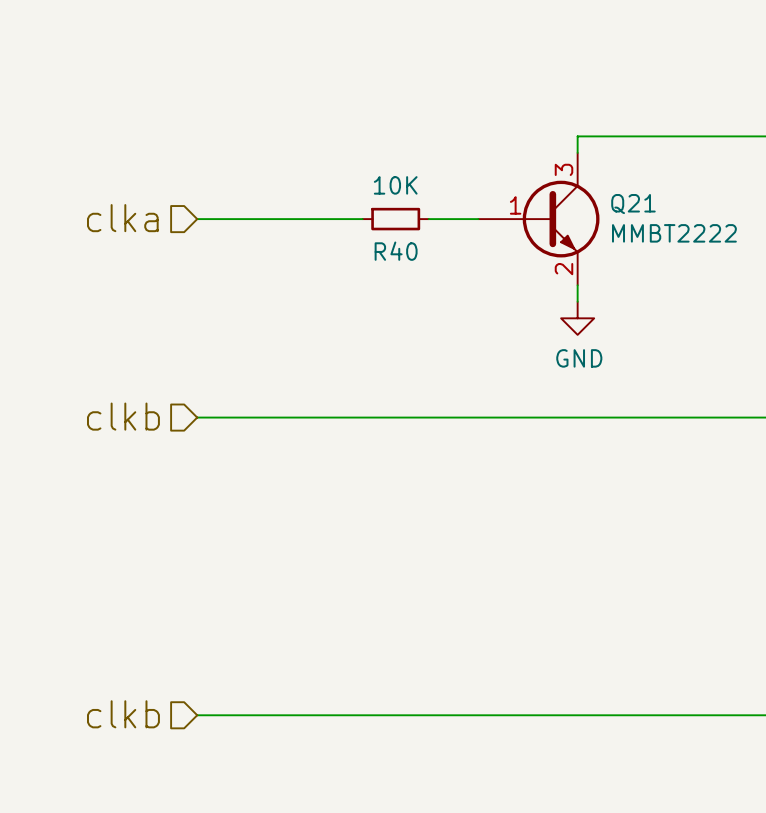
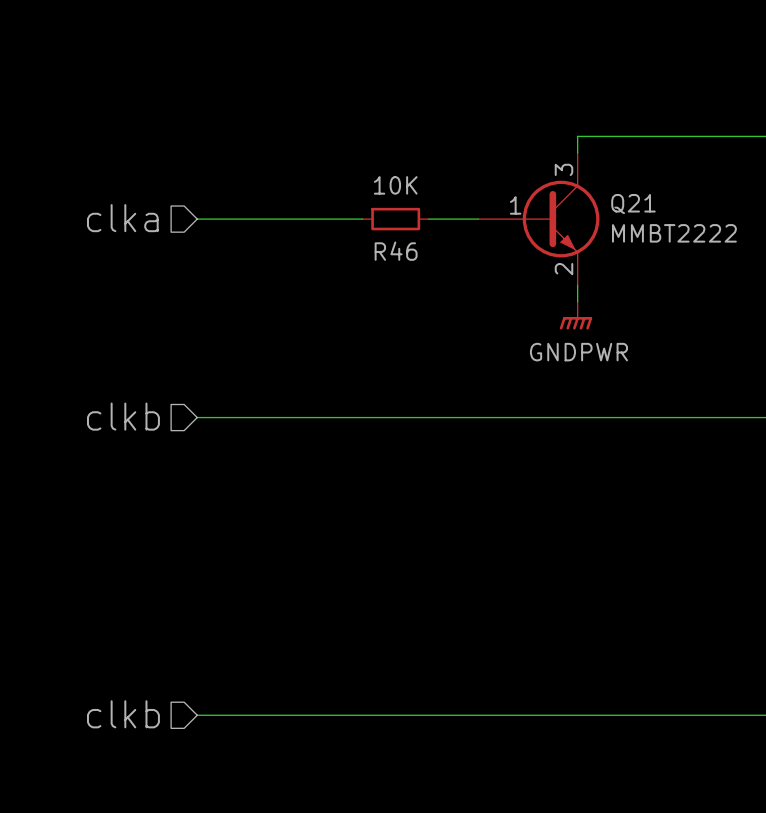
R40 name: R40 (396, 251) -> R46 (396, 251)
power symbol: GND (577, 318) -> GNDPWR (575, 315)

